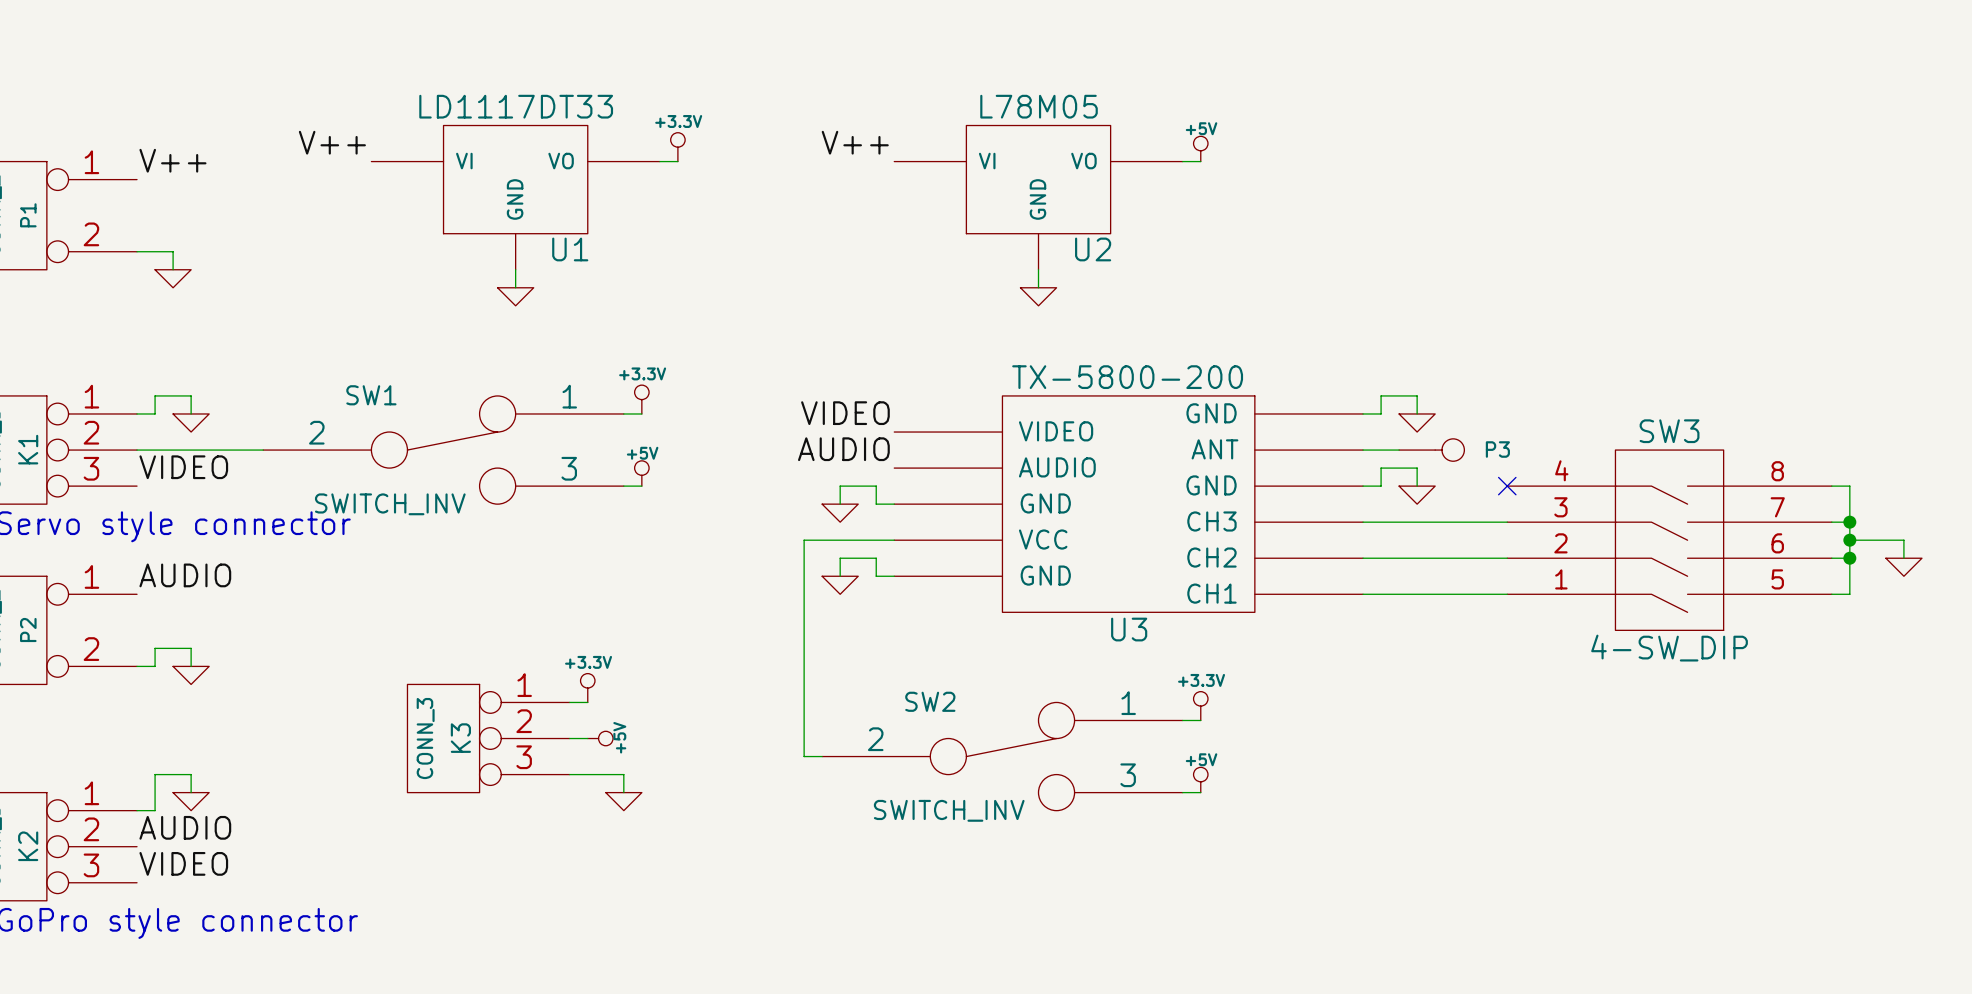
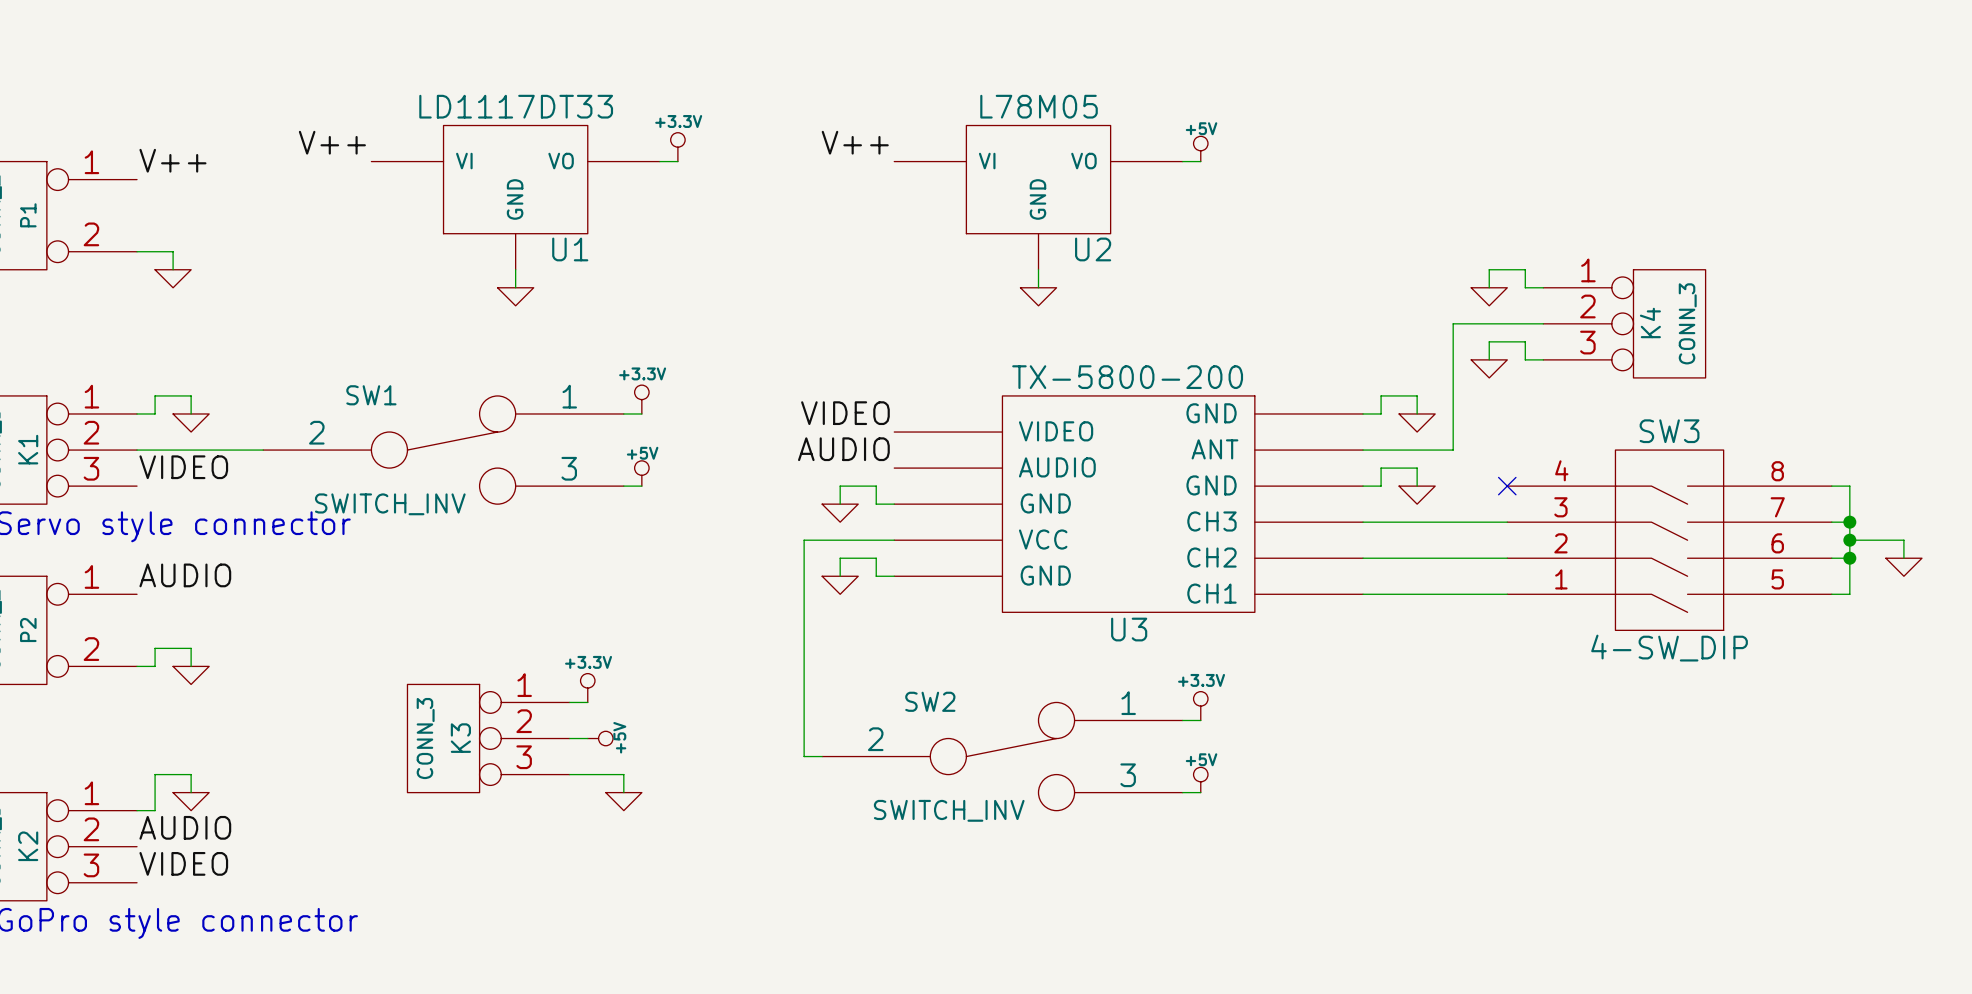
wire: none -> (1489, 287) (1489, 269) (1525, 269) (1525, 287) (1543, 287)
power symbol: none -> (1489, 296)
wire: none -> (1543, 323) (1453, 323) (1453, 450) (1399, 450)
K4: none -> CONN_3 (1624, 323)
wire: none -> (1489, 359) (1489, 341) (1525, 341) (1525, 359) (1543, 359)
power symbol: none -> (1489, 368)
P3: (1431, 450) -> none

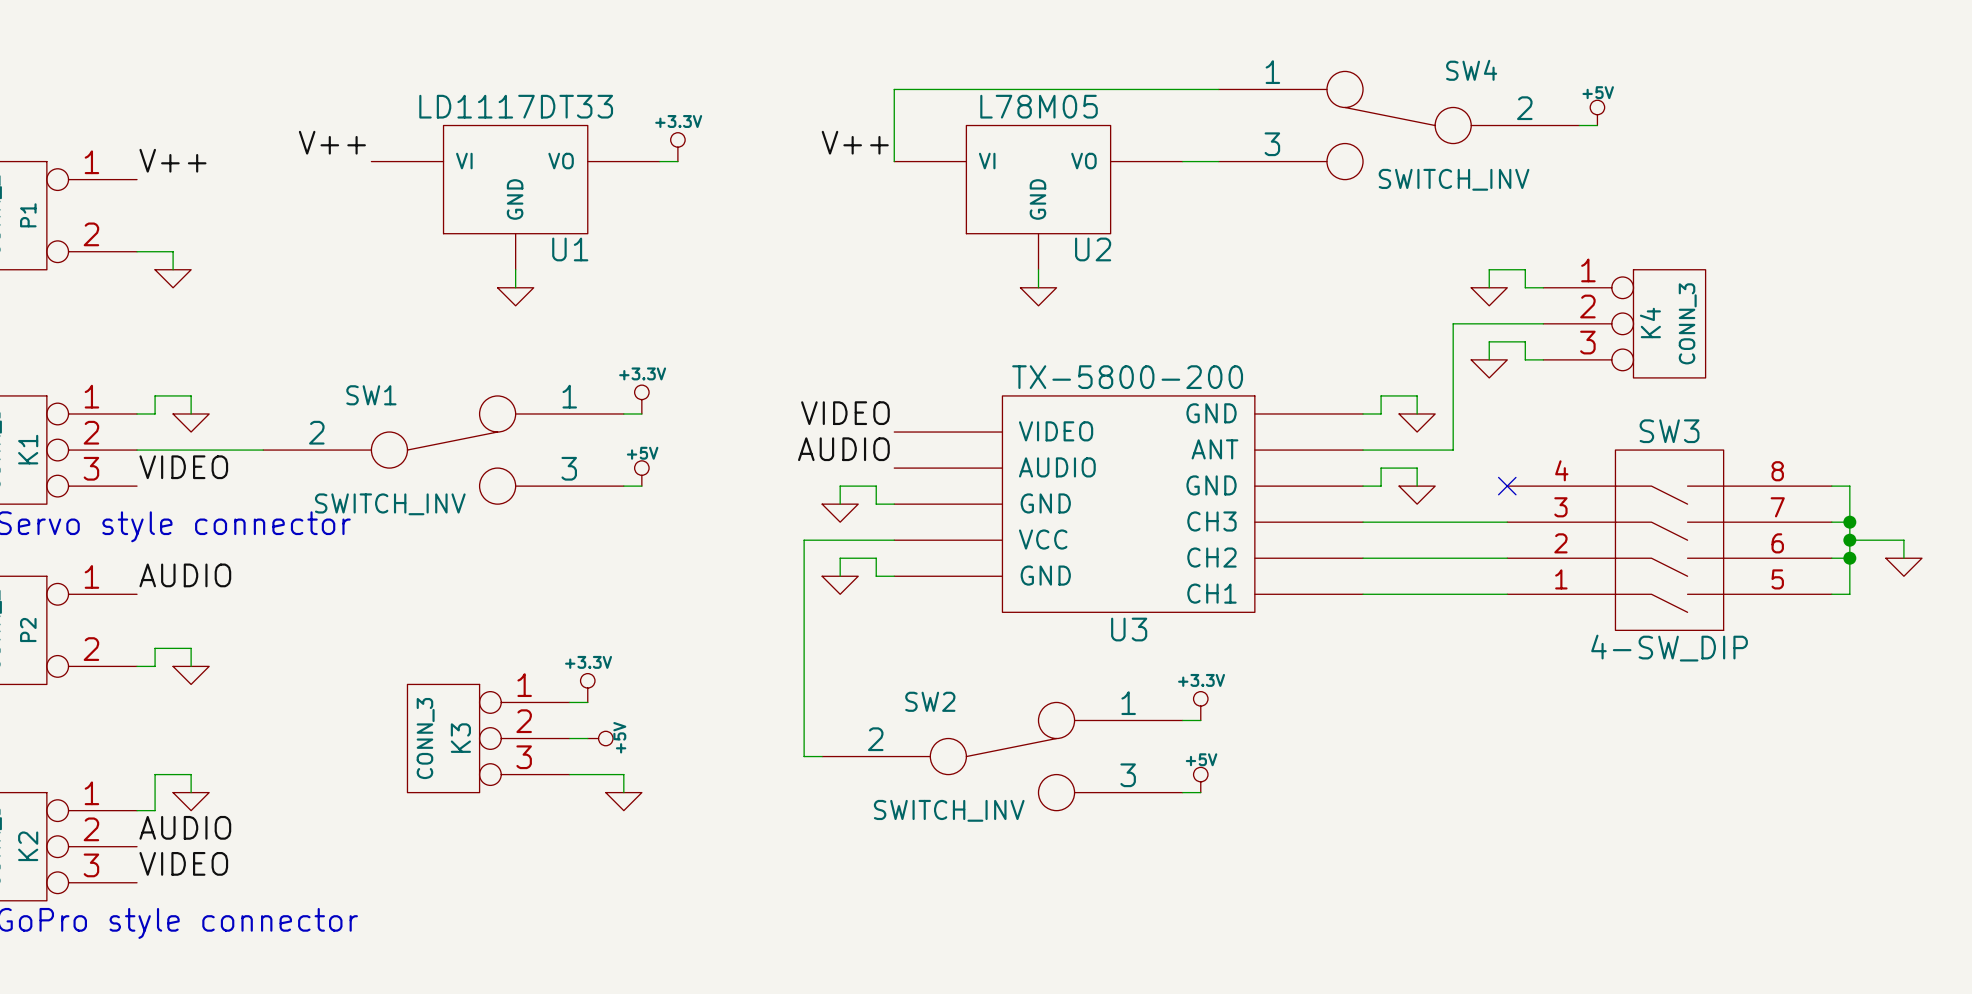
wire: none -> (1218, 89) (894, 89) (894, 161)
power symbol: none -> +5V (1597, 112)
SW4: none -> SWITCH_INV (1399, 125)
wire: none -> (1579, 125) (1597, 125)
power symbol: +5V (1200, 148) -> none
wire: none -> (1200, 161) (1218, 161)

